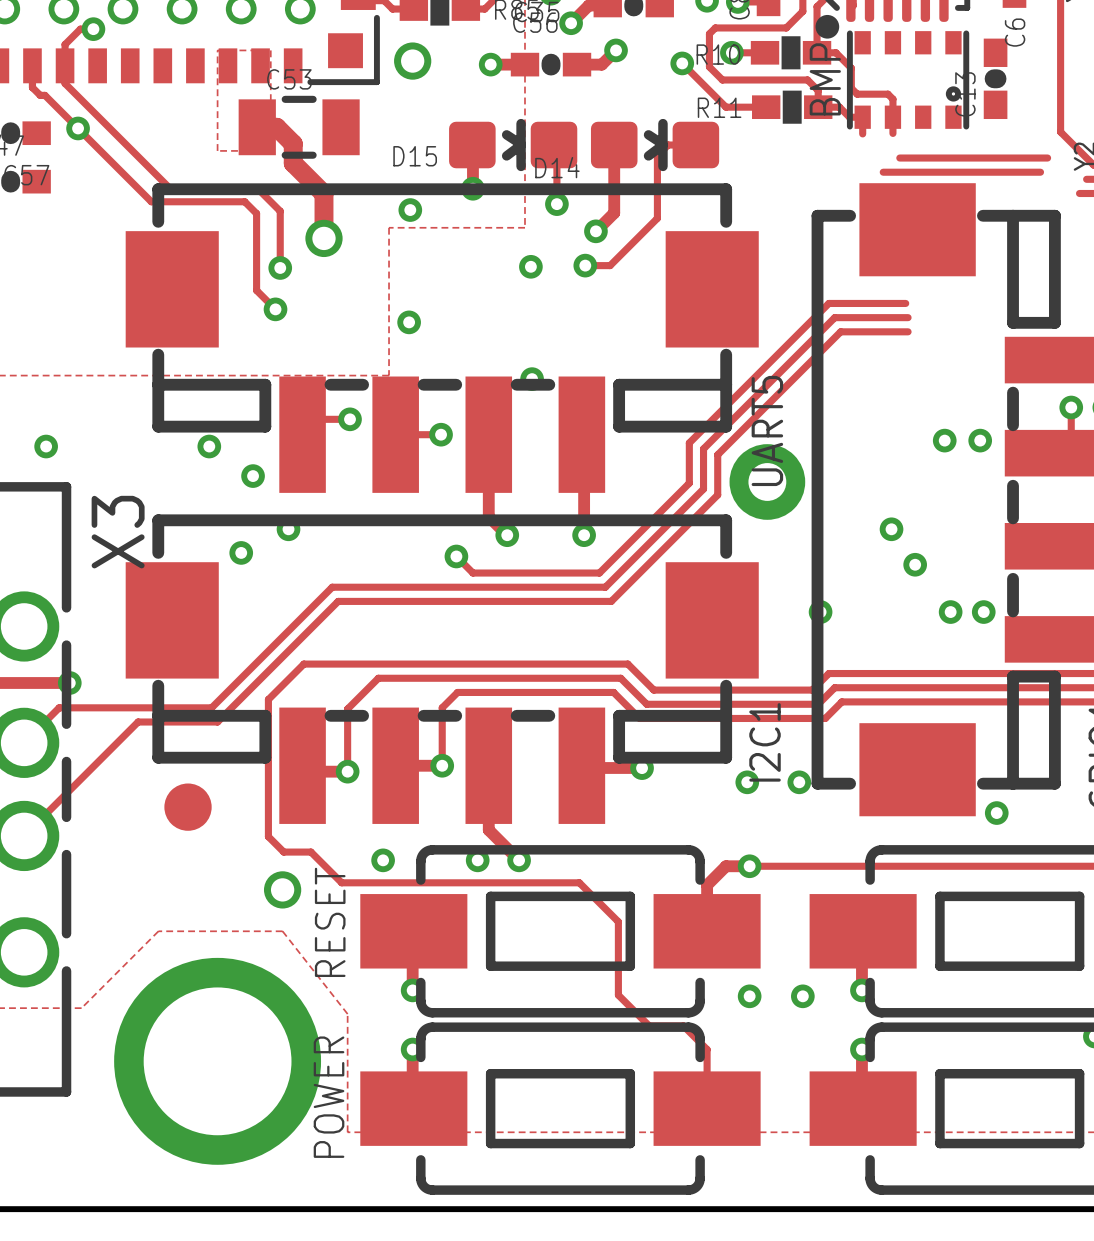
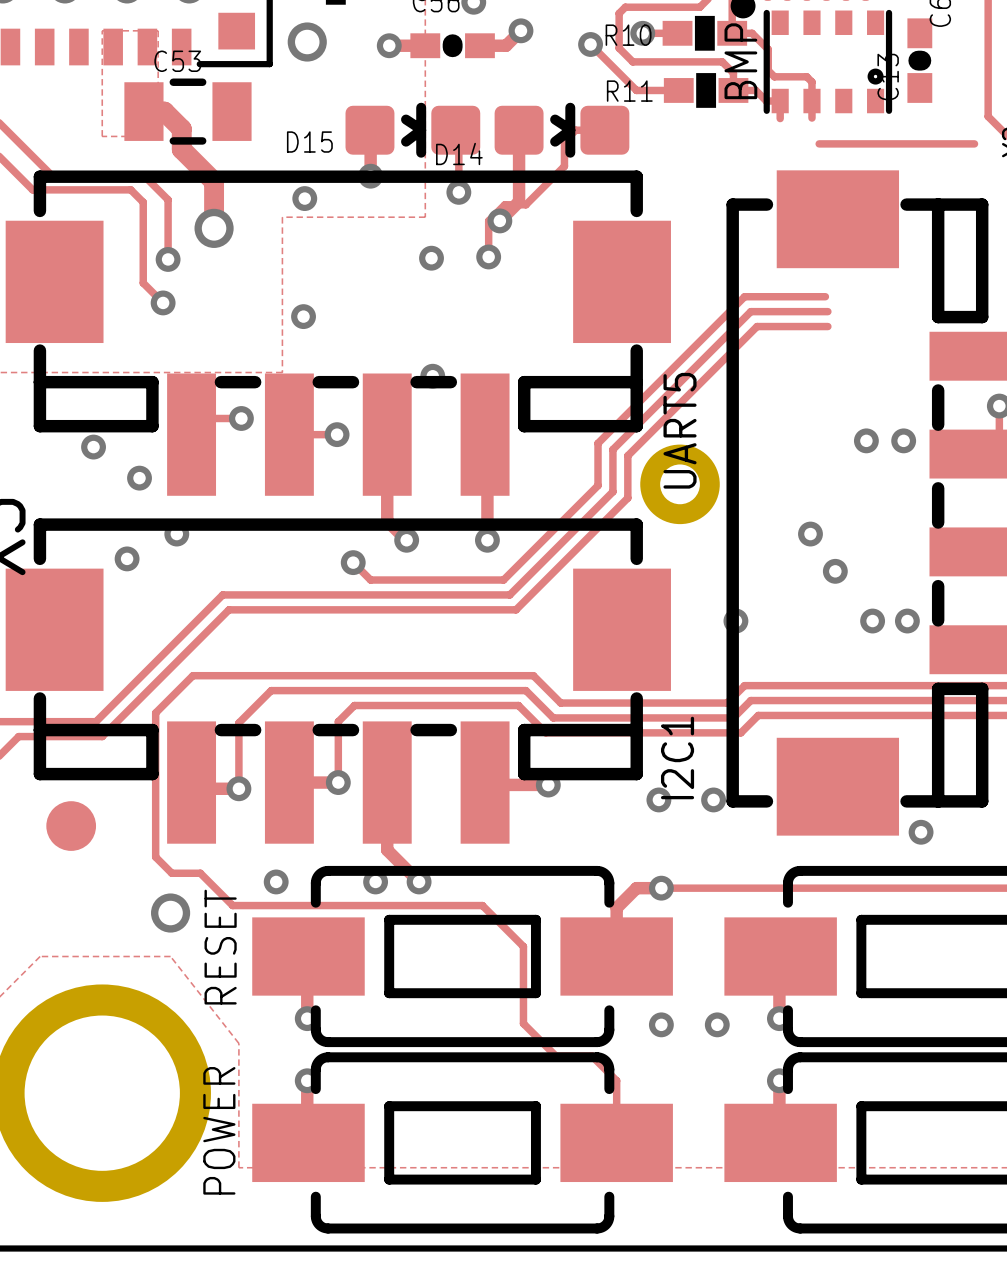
track: (883, 172) (1040, 172) -> none
track: (657, 179) (657, 218) (610, 265) (585, 265) -> (564, 166) (525, 204) (504, 204) (488, 220) (488, 256)

